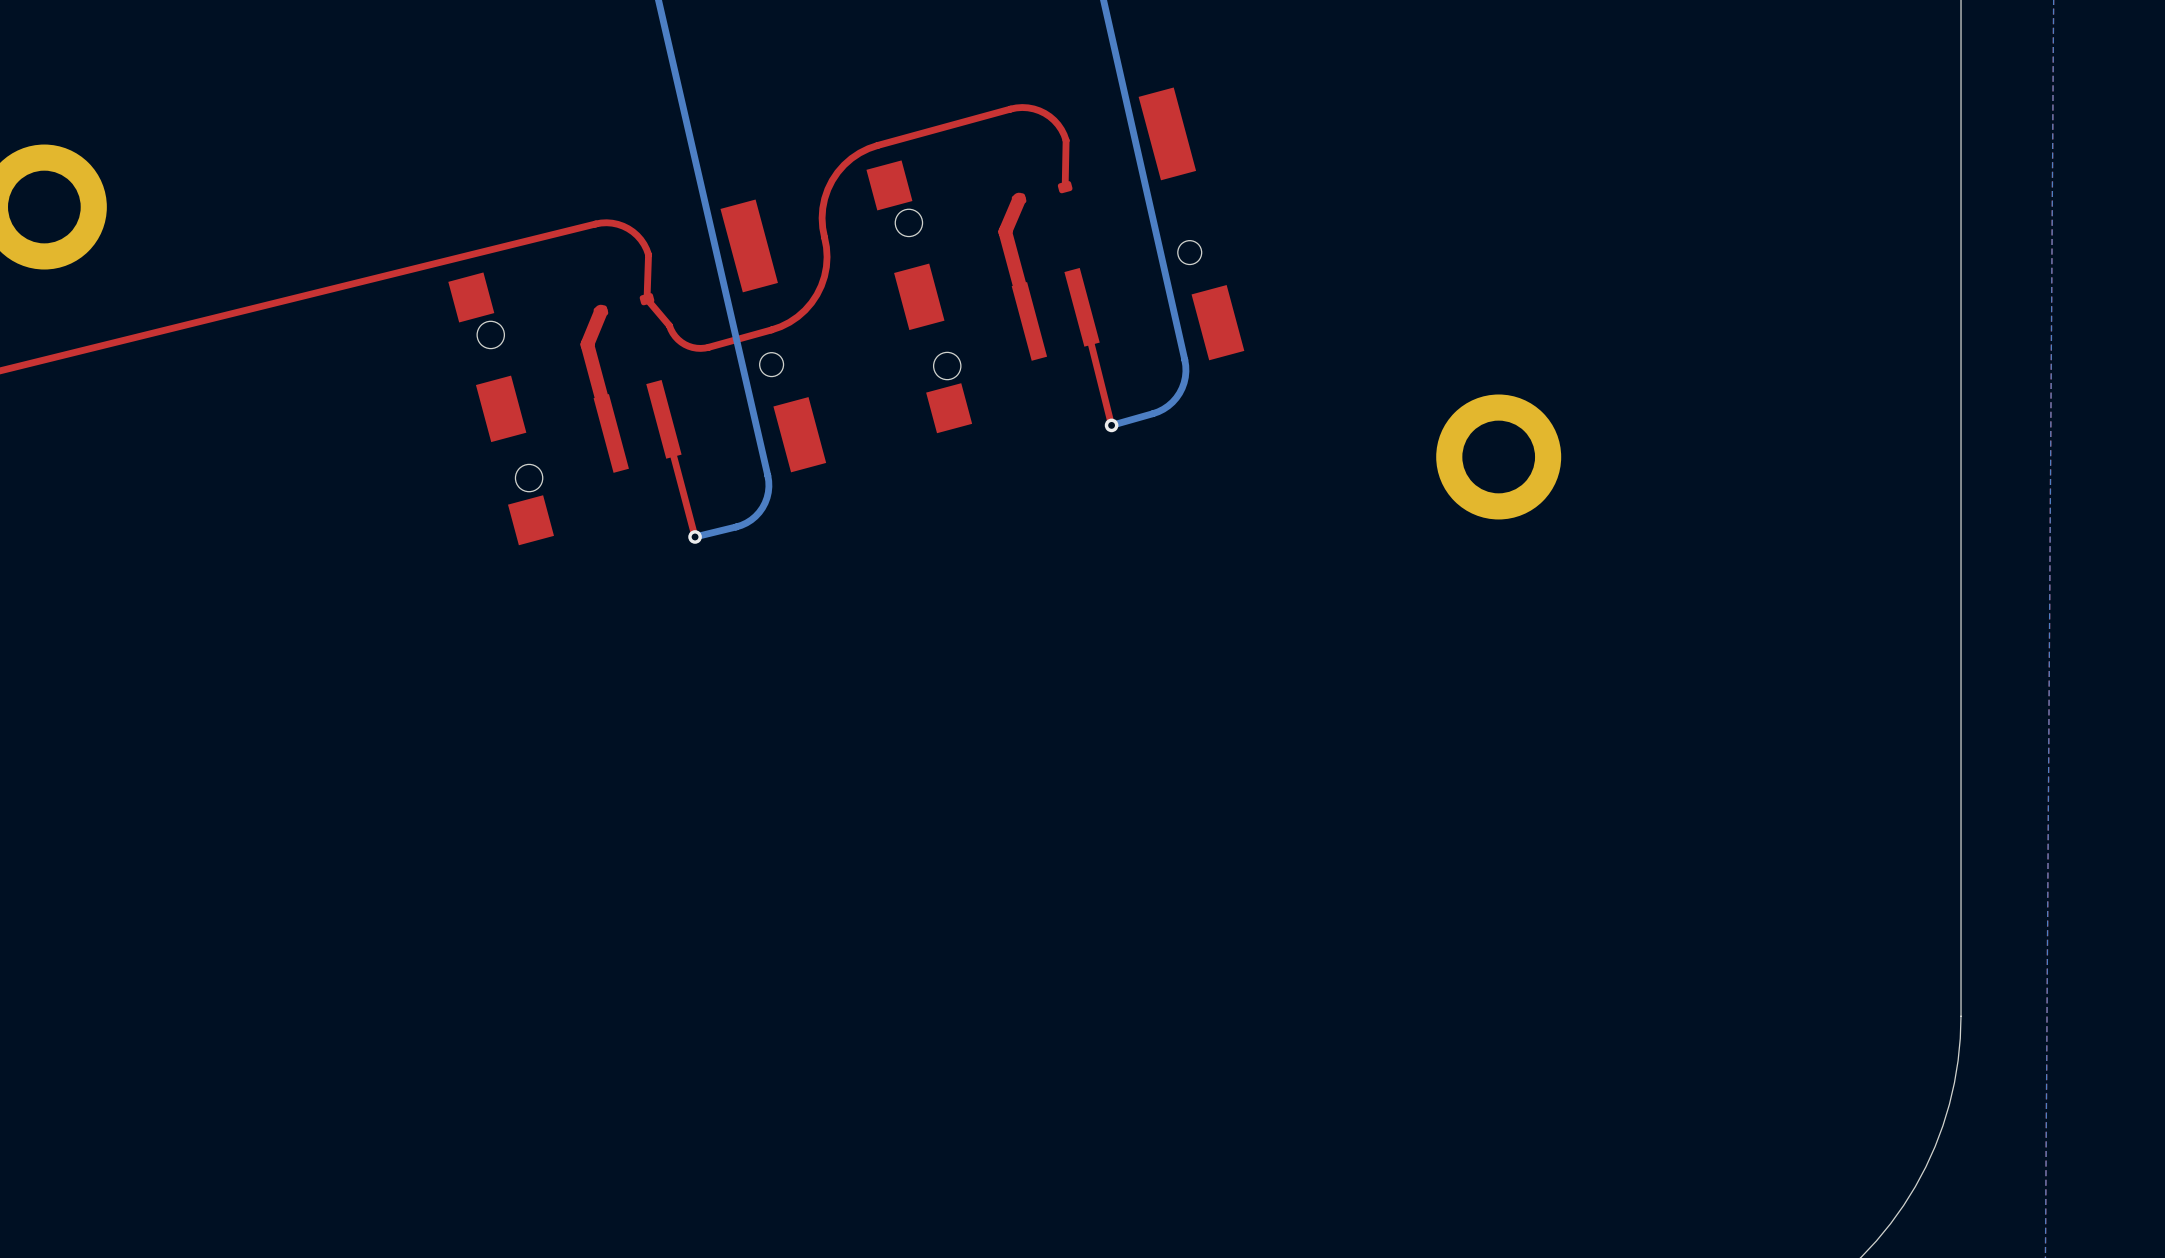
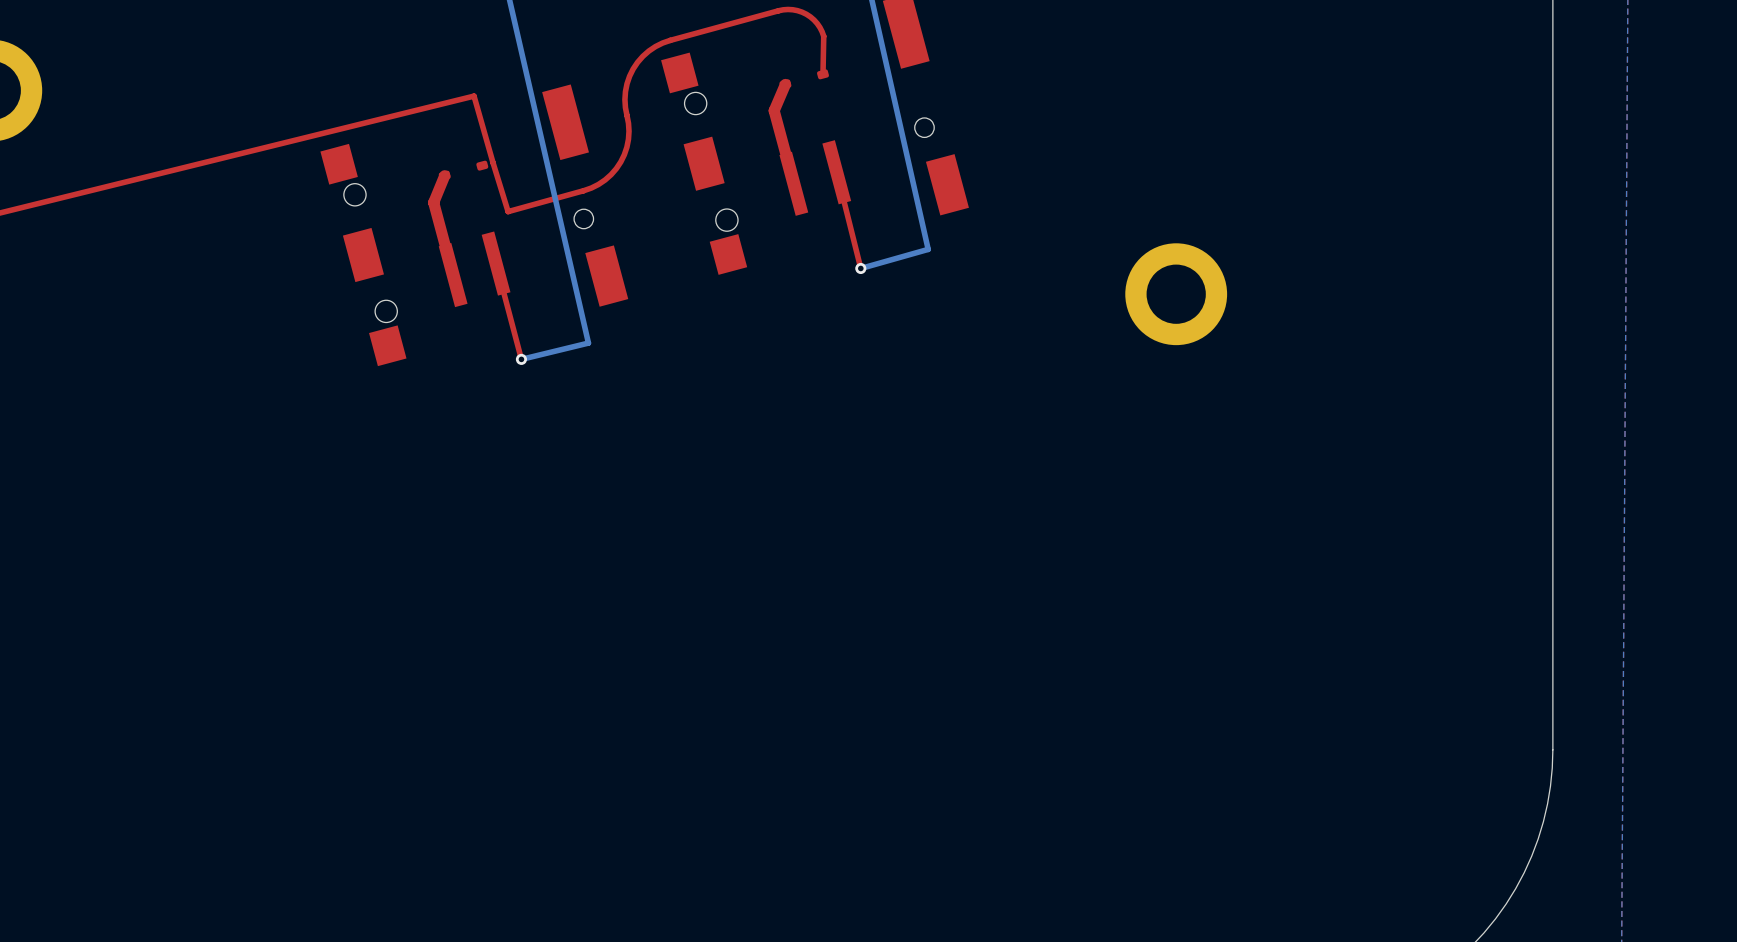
top track: (595, 224) (617, 224) (637, 235) (648, 254) (647, 299) (681, 342) (692, 347) (708, 347) -> (440, 104) (474, 96) (508, 211) (532, 204)
bottom track: (1184, 360) (1185, 377) (1179, 393) (1168, 406) (1152, 413) -> (920, 215) (928, 249) (894, 258)
bottom track: (767, 475) (768, 492) (762, 507) (751, 520) (736, 526) -> (580, 309) (588, 343) (554, 351)

